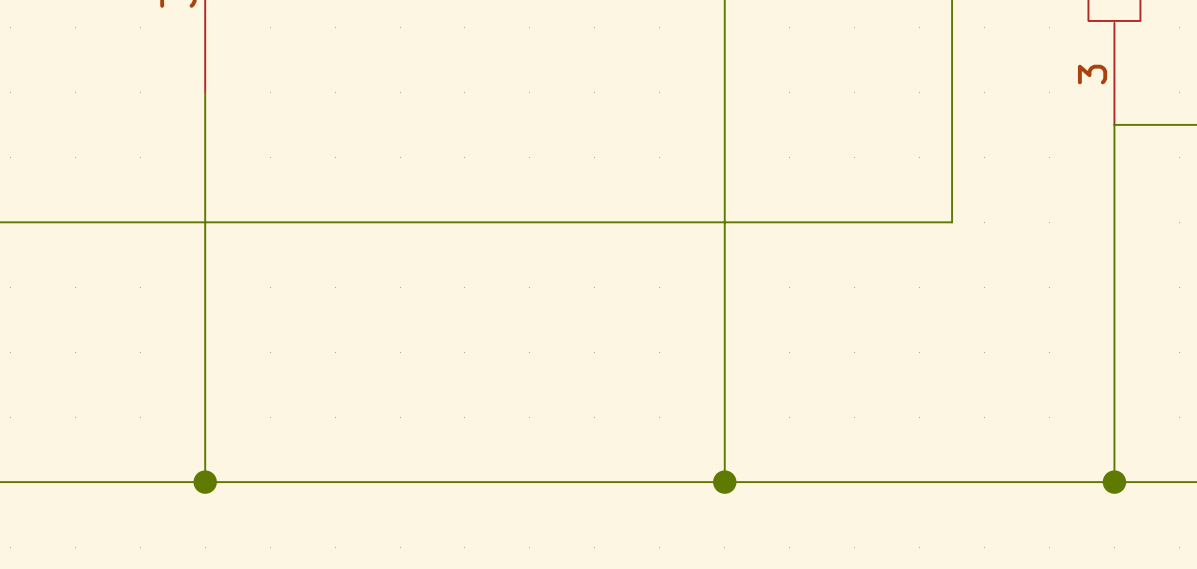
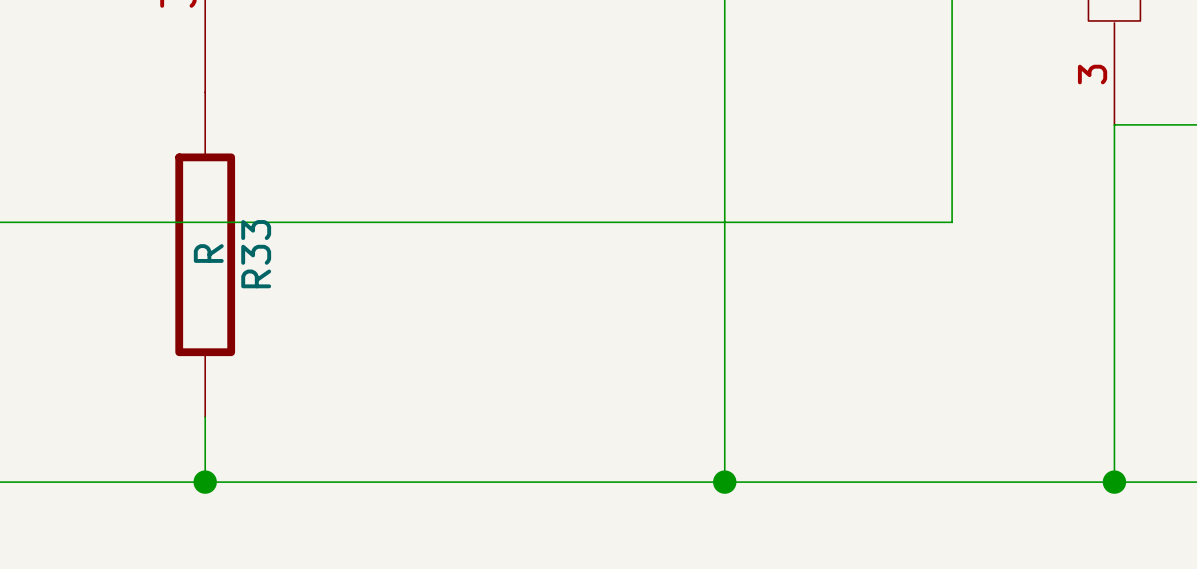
wire: (205, 92) (205, 417) -> none
R33: none -> R (205, 254)

